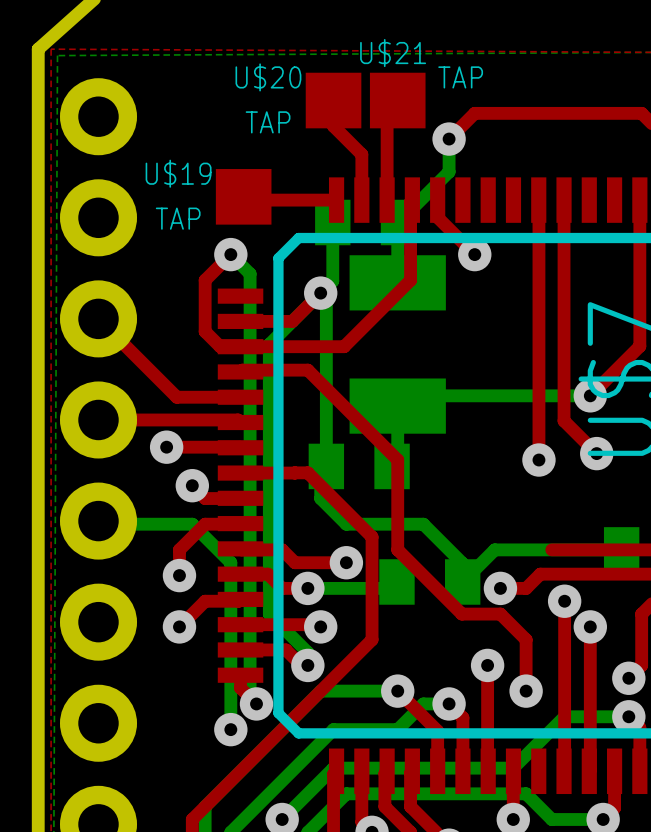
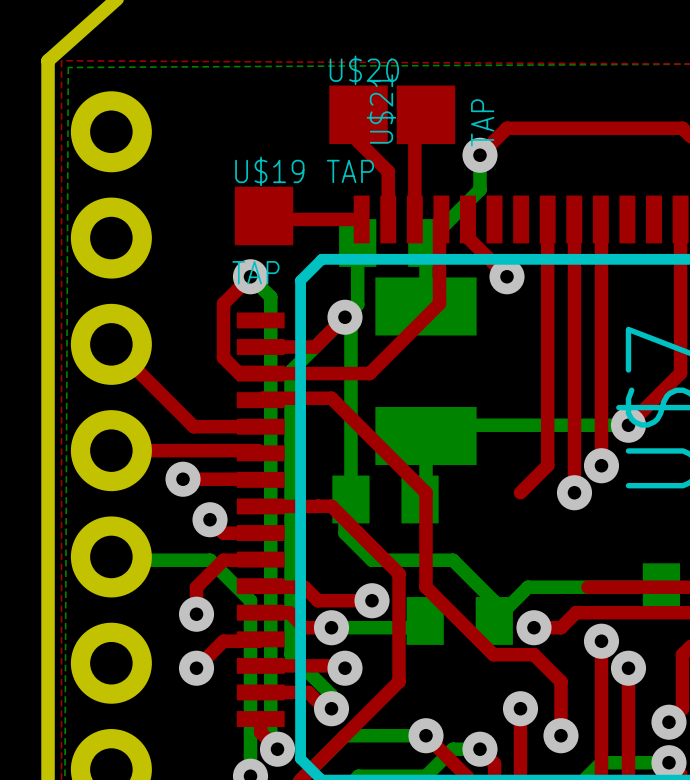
U$21 name rotation: 0° (393, 53) -> 90° counterclockwise (381, 108)
U$20 name position: U$20 (268, 77) -> U$20 (364, 70)
U$21 value rotation: 0° (460, 77) -> 90° counterclockwise (482, 122)
U$20 value position: TAP (268, 122) -> TAP (350, 171)
U$19 name position: U$19 (178, 173) -> U$19 (269, 171)
top track: none -> (547, 219) (547, 465) (520, 492)
top track: (564, 200) (564, 420) (596, 453) -> (601, 220) (601, 465)
U$19 value position: TAP (178, 218) -> TAP (255, 272)
via position: (596, 453) -> (601, 465)

